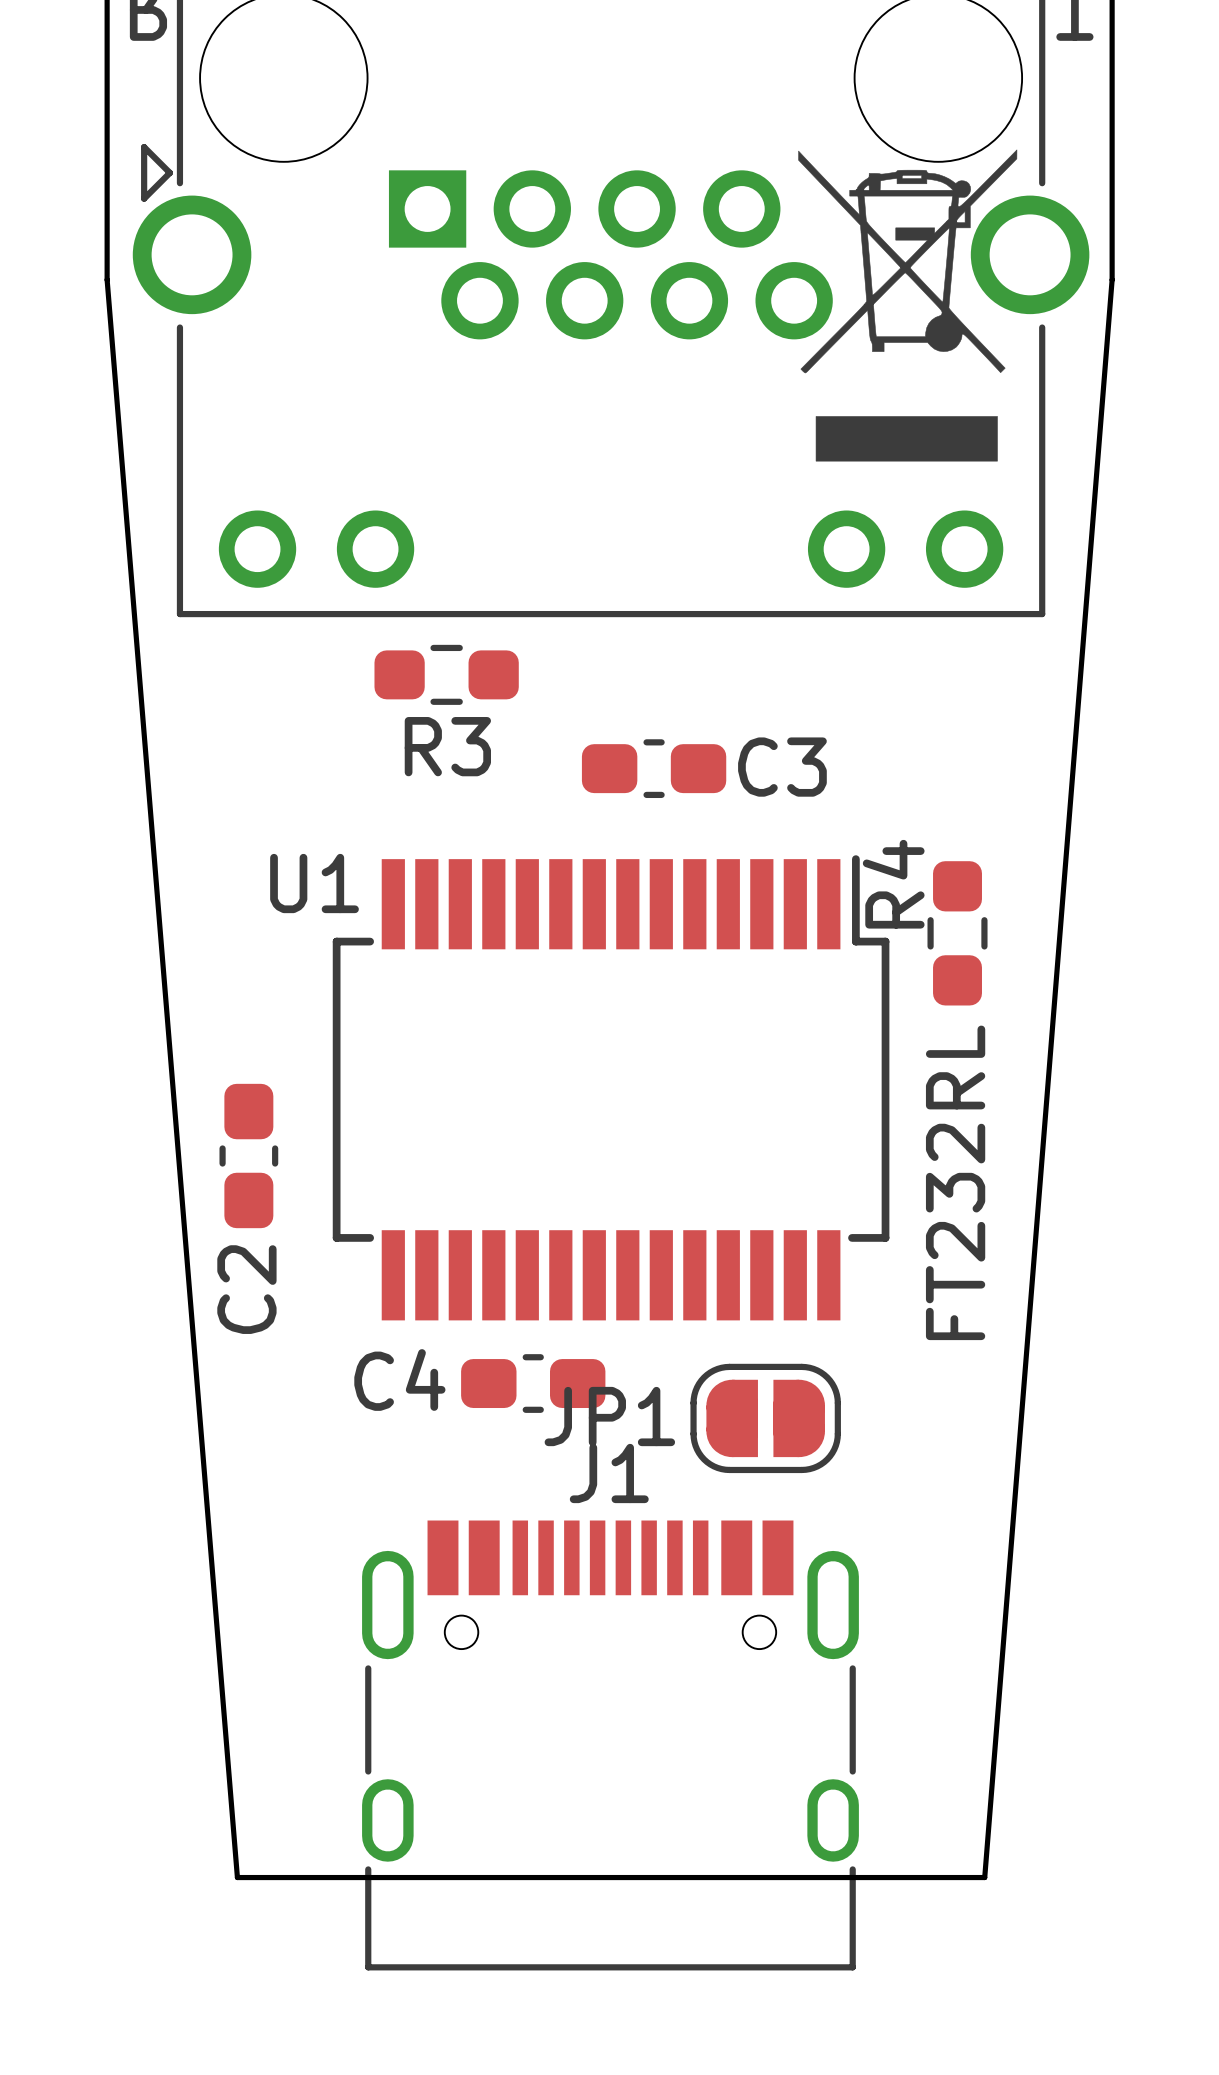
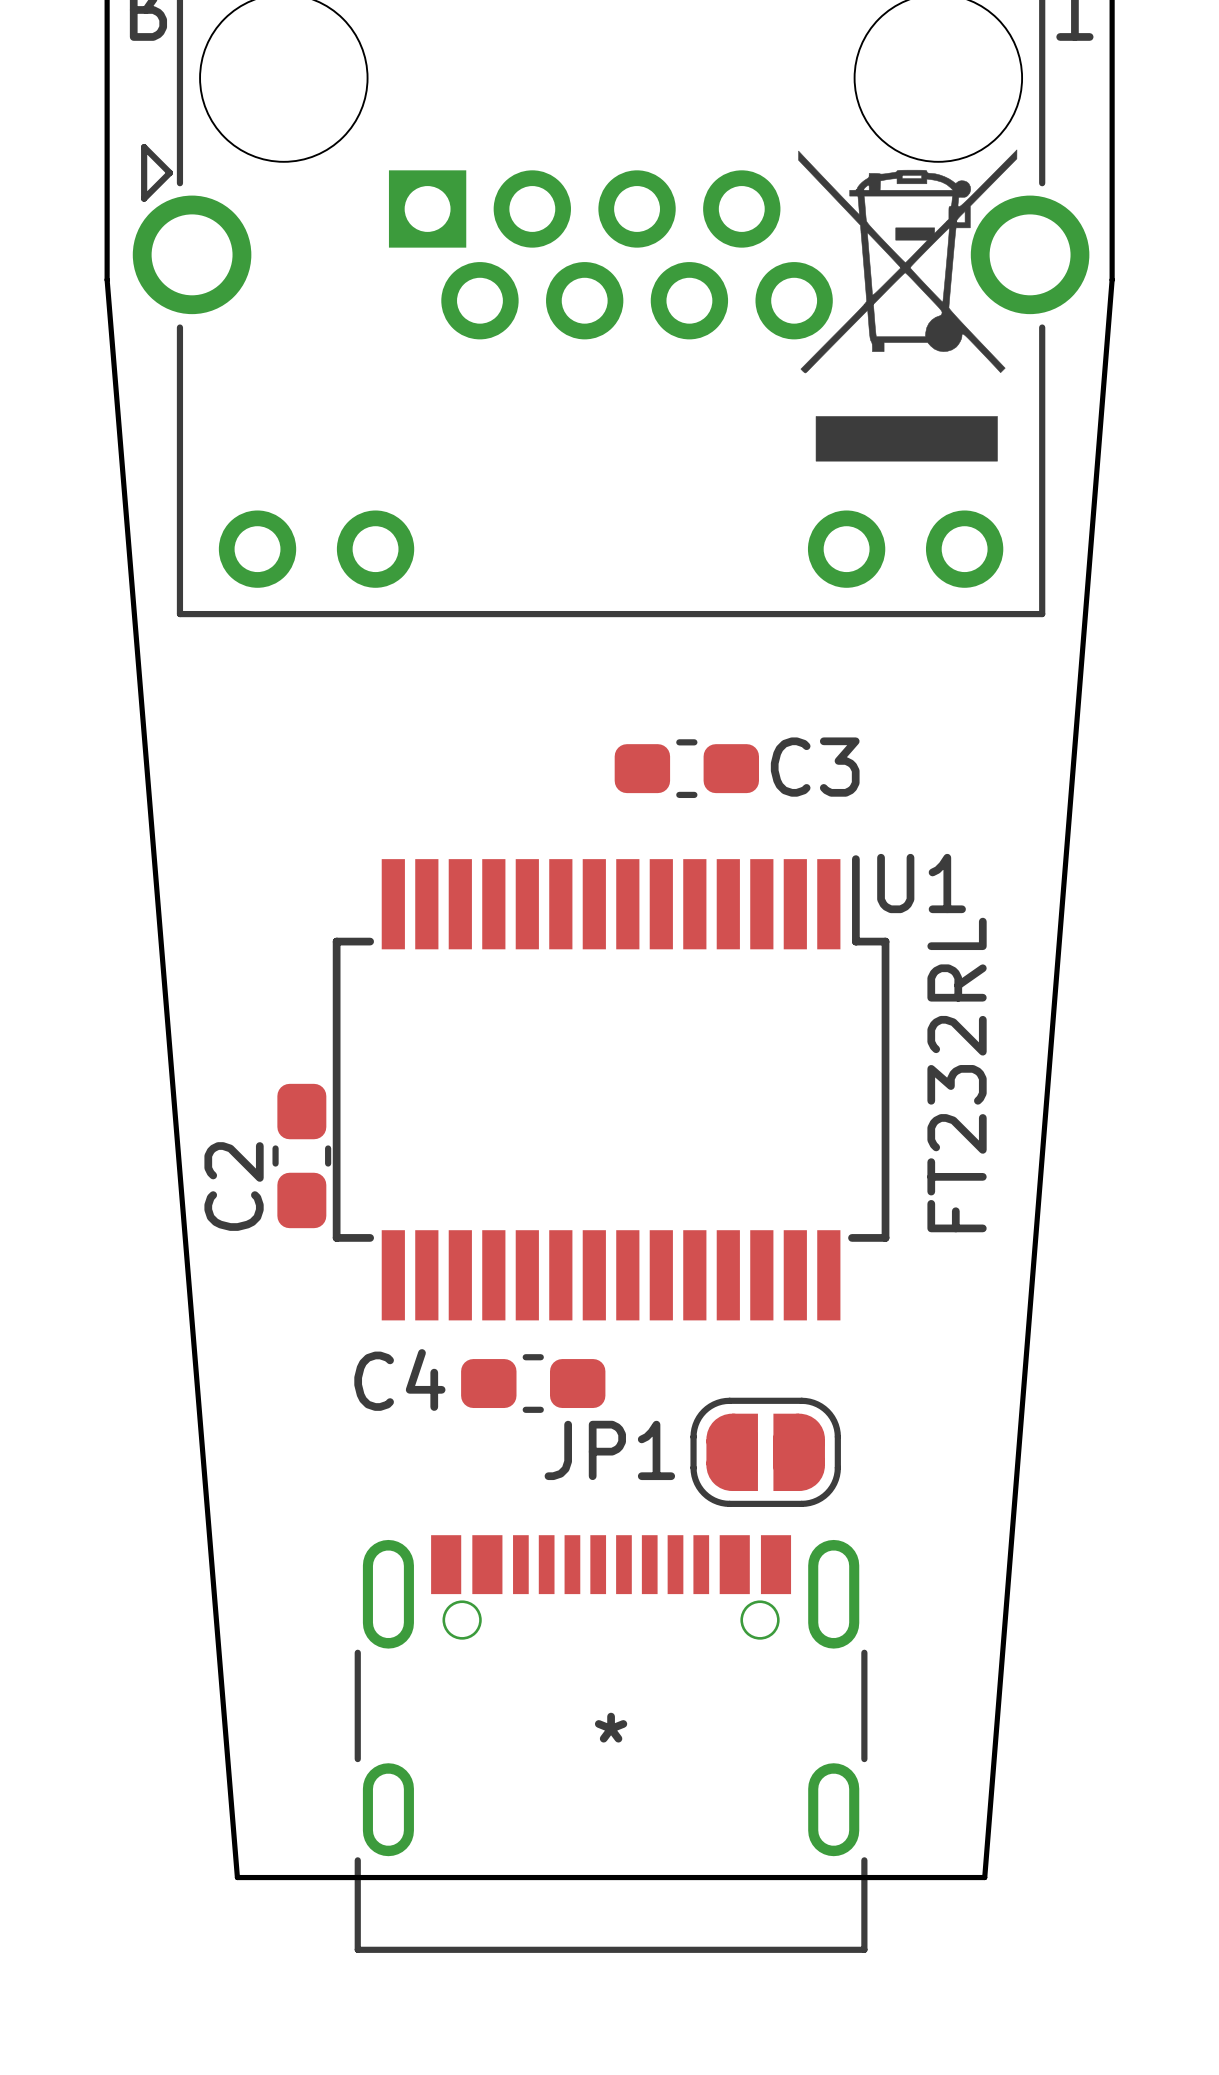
R3: (446, 674) -> none
C3 position: (654, 768) -> (686, 768)
U1 name position: U1 (314, 883) -> U1 (921, 883)
R4: (957, 933) -> none
C2 position: (248, 1156) -> (301, 1156)
text position: FT232RL (955, 1182) -> FT232RL (957, 1075)
C2 name position: C2 (246, 1289) -> C2 (234, 1186)
JP1 position: (765, 1418) -> (765, 1452)
part: none -> (611, 1744)
J1: (610, 1745) -> none

